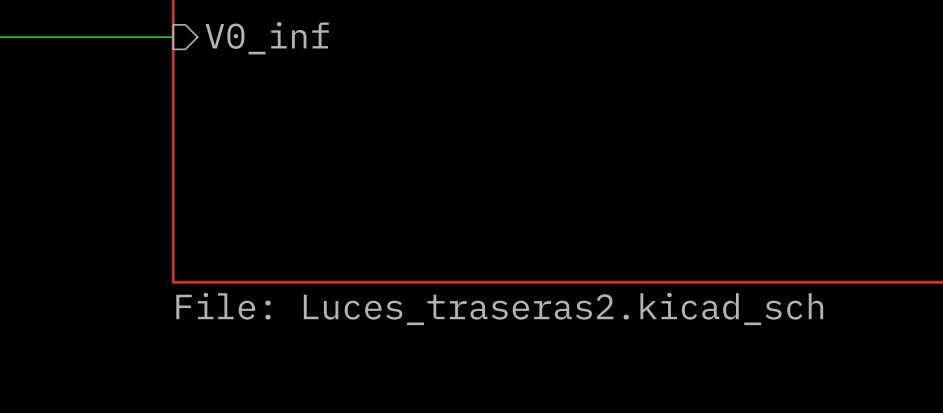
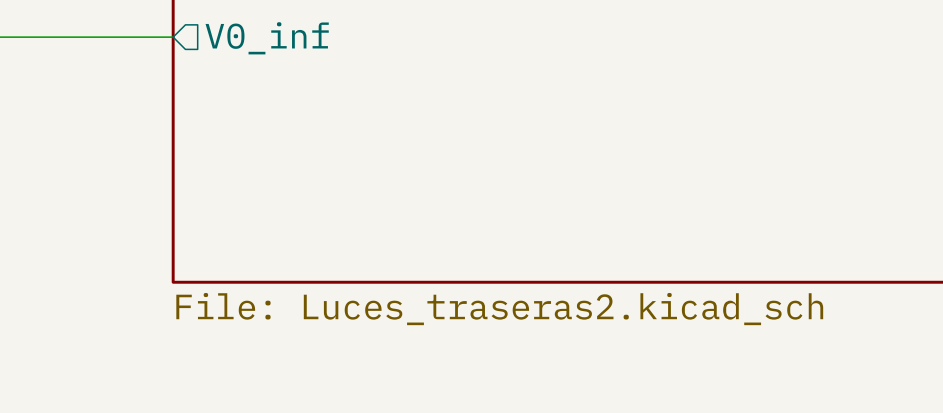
sheet pin shape: input (267, 38) -> output (267, 38)

